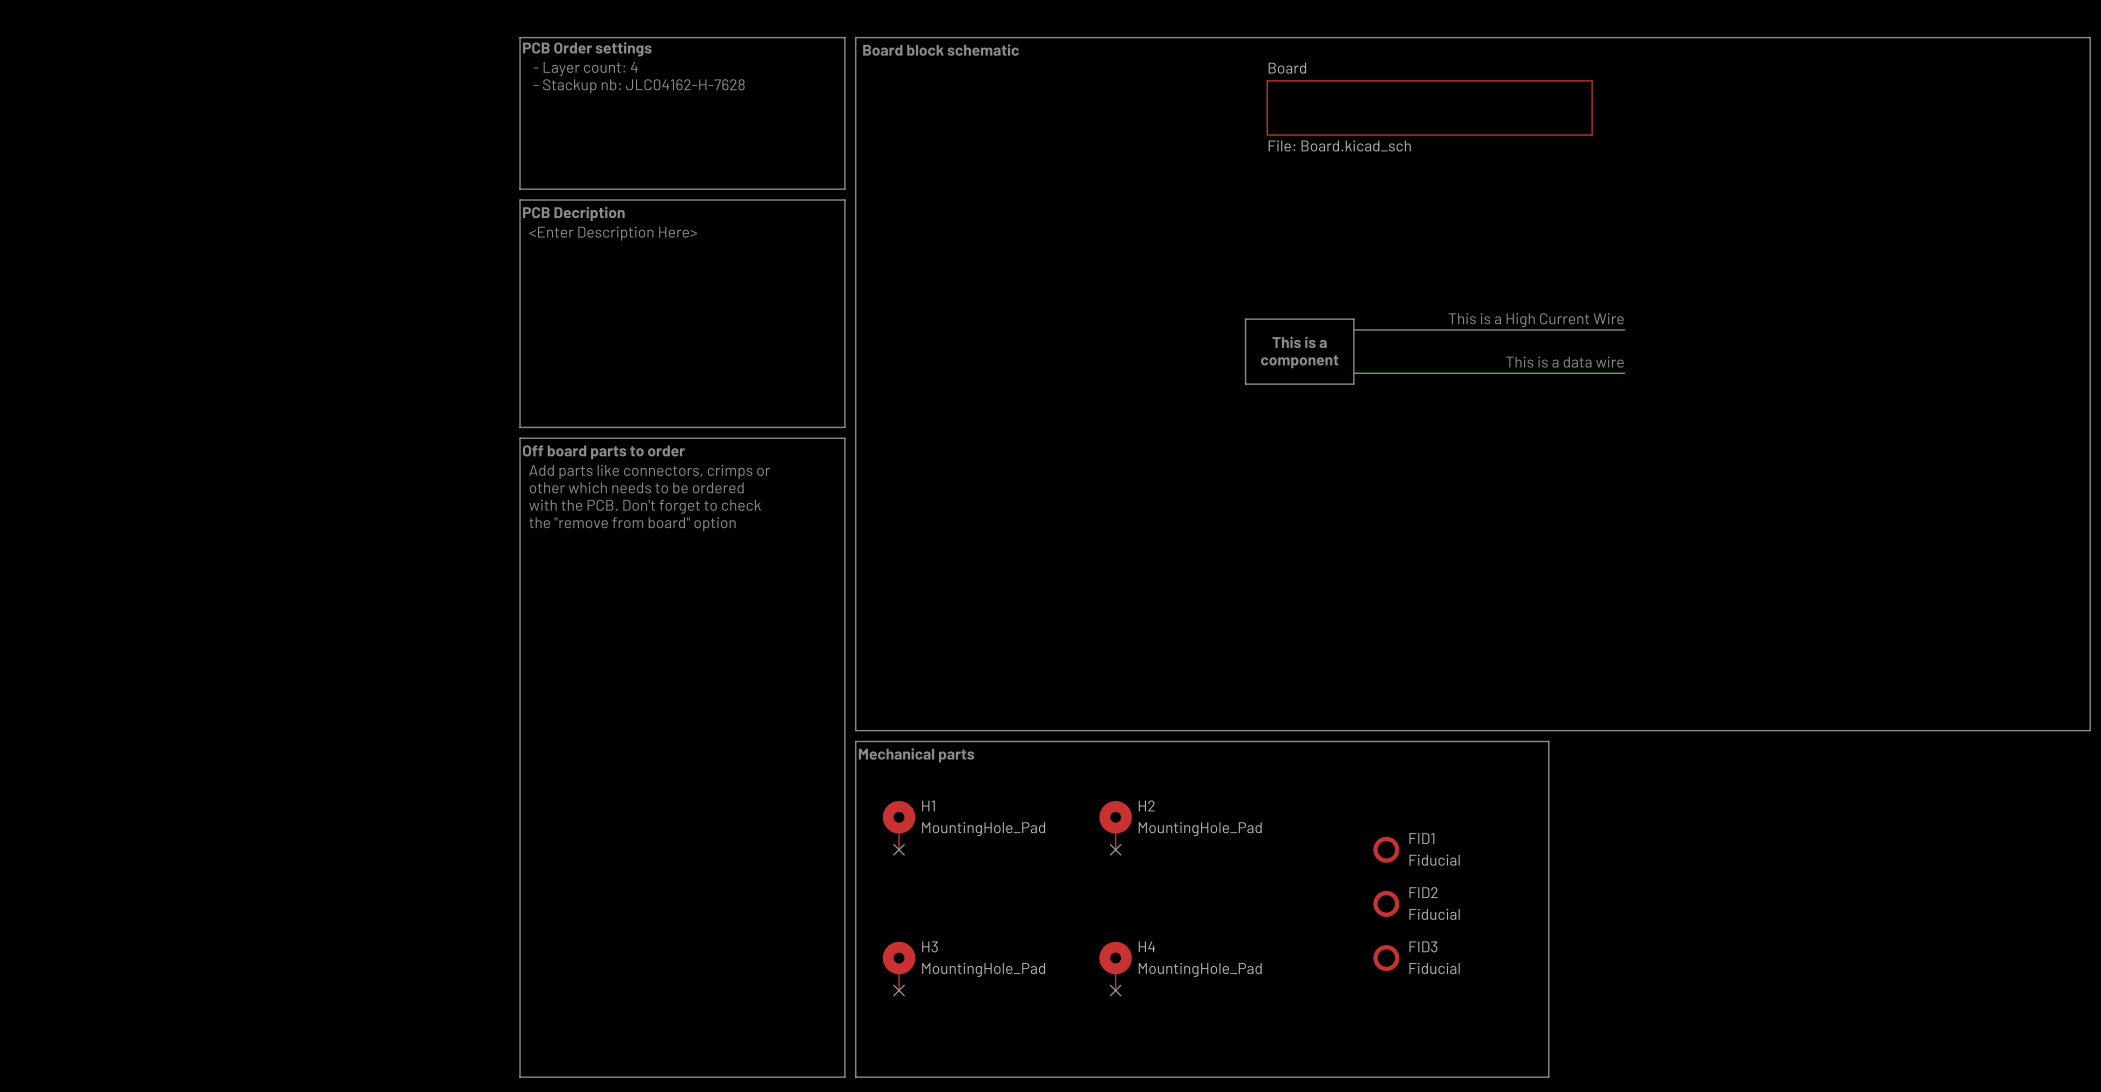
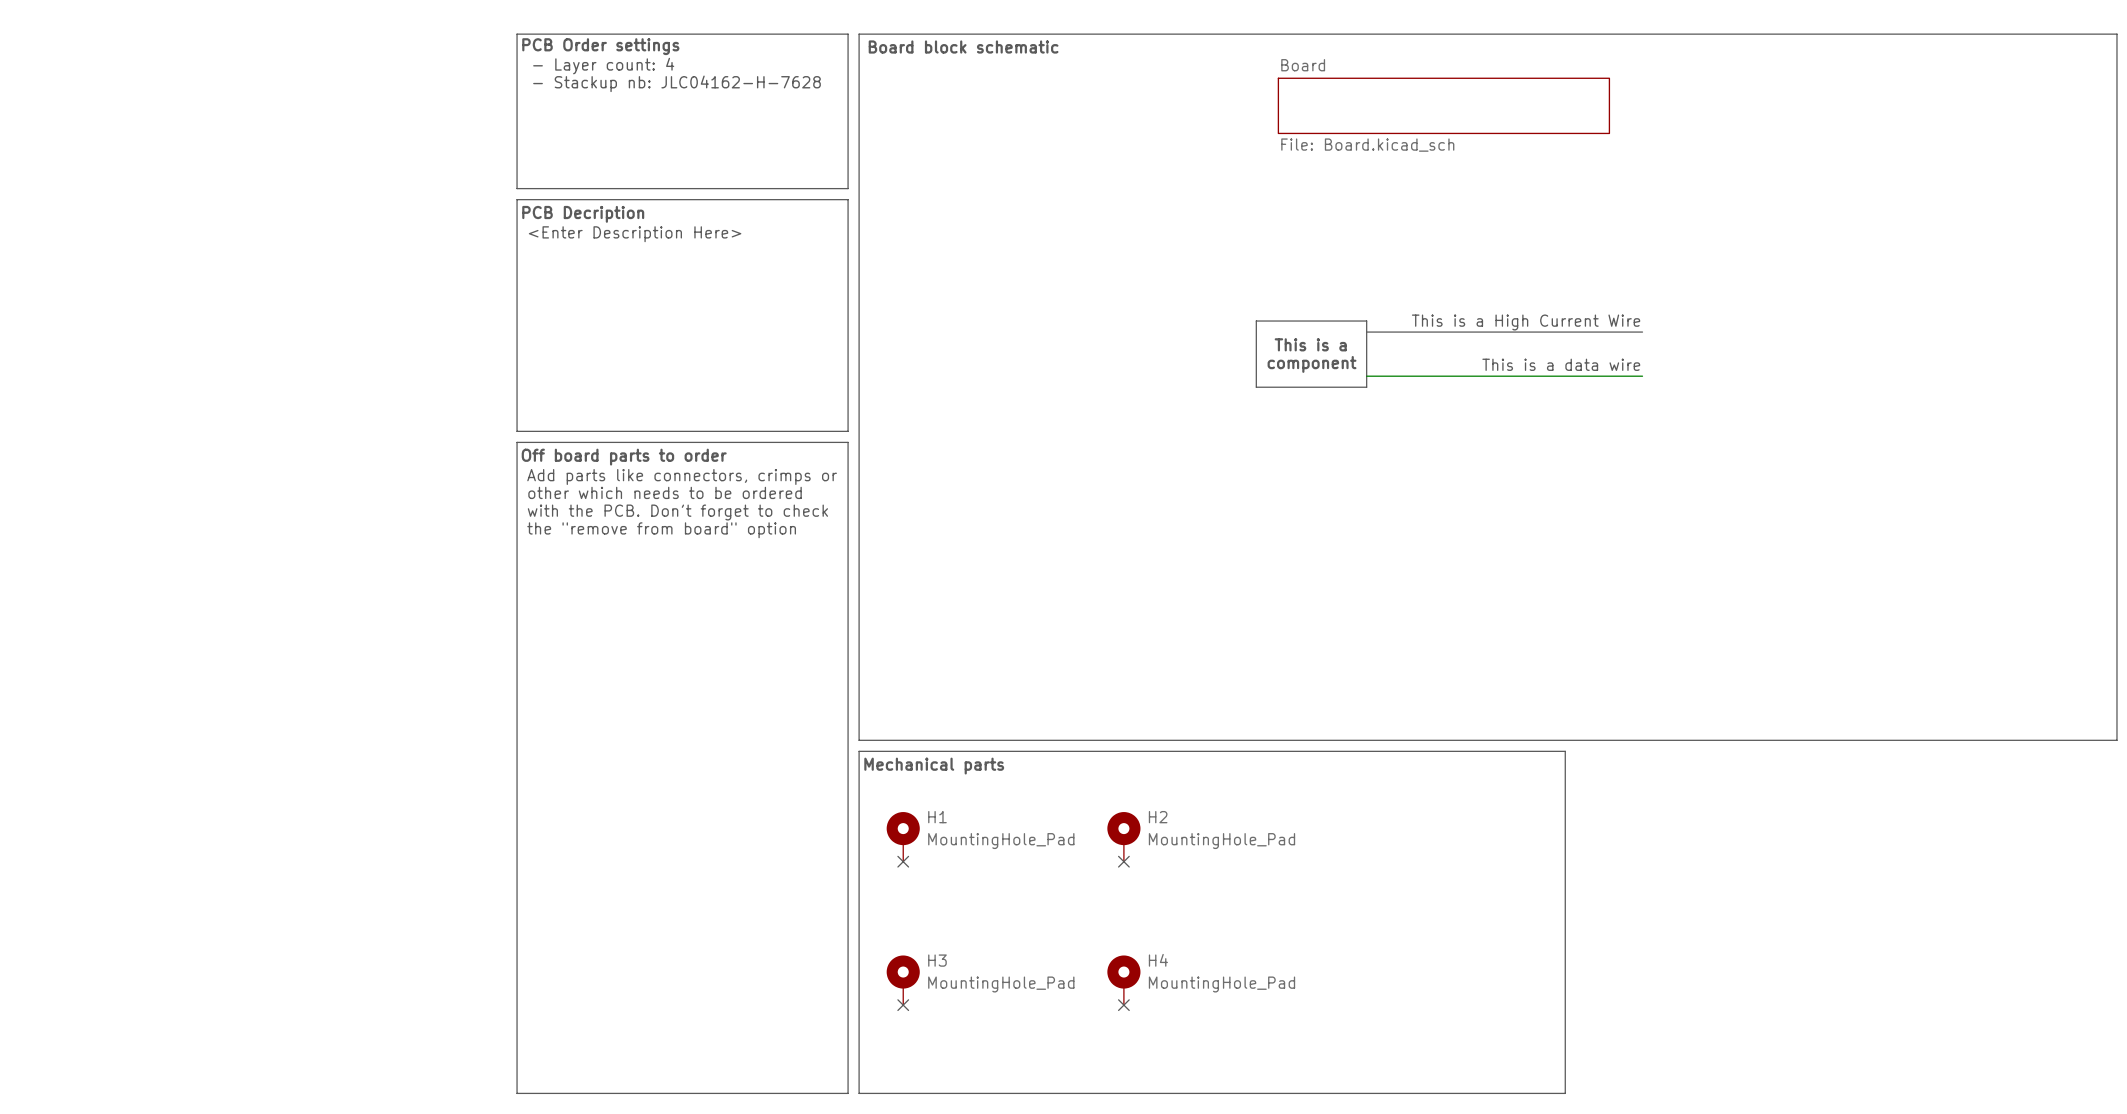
FID1: Fiducial (1386, 849) -> none
FID2: Fiducial (1386, 903) -> none
FID3: Fiducial (1386, 958) -> none

